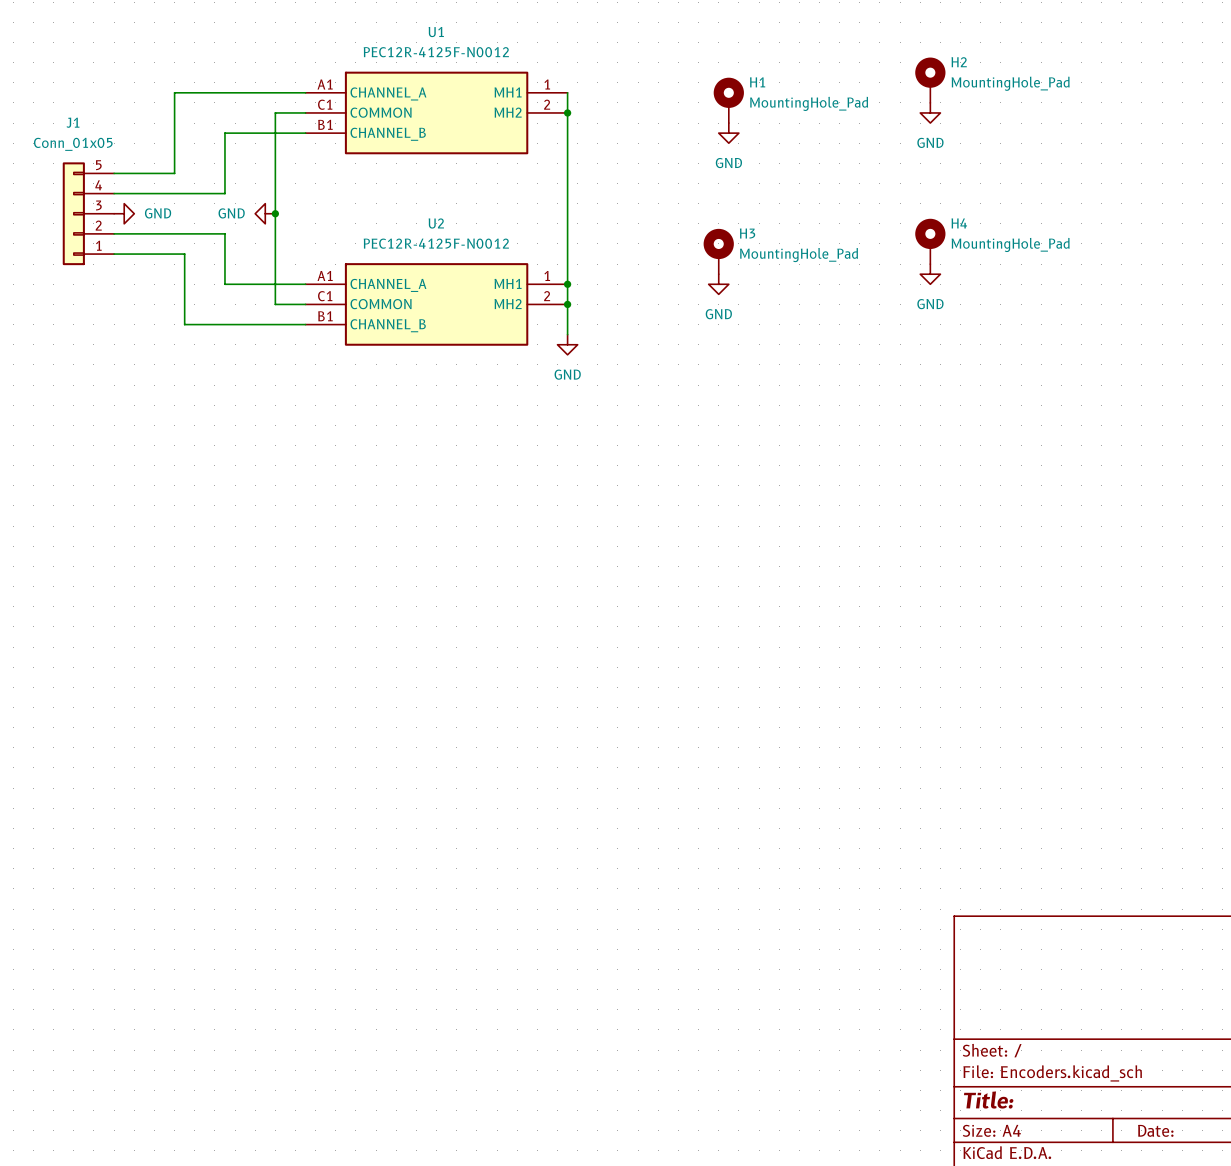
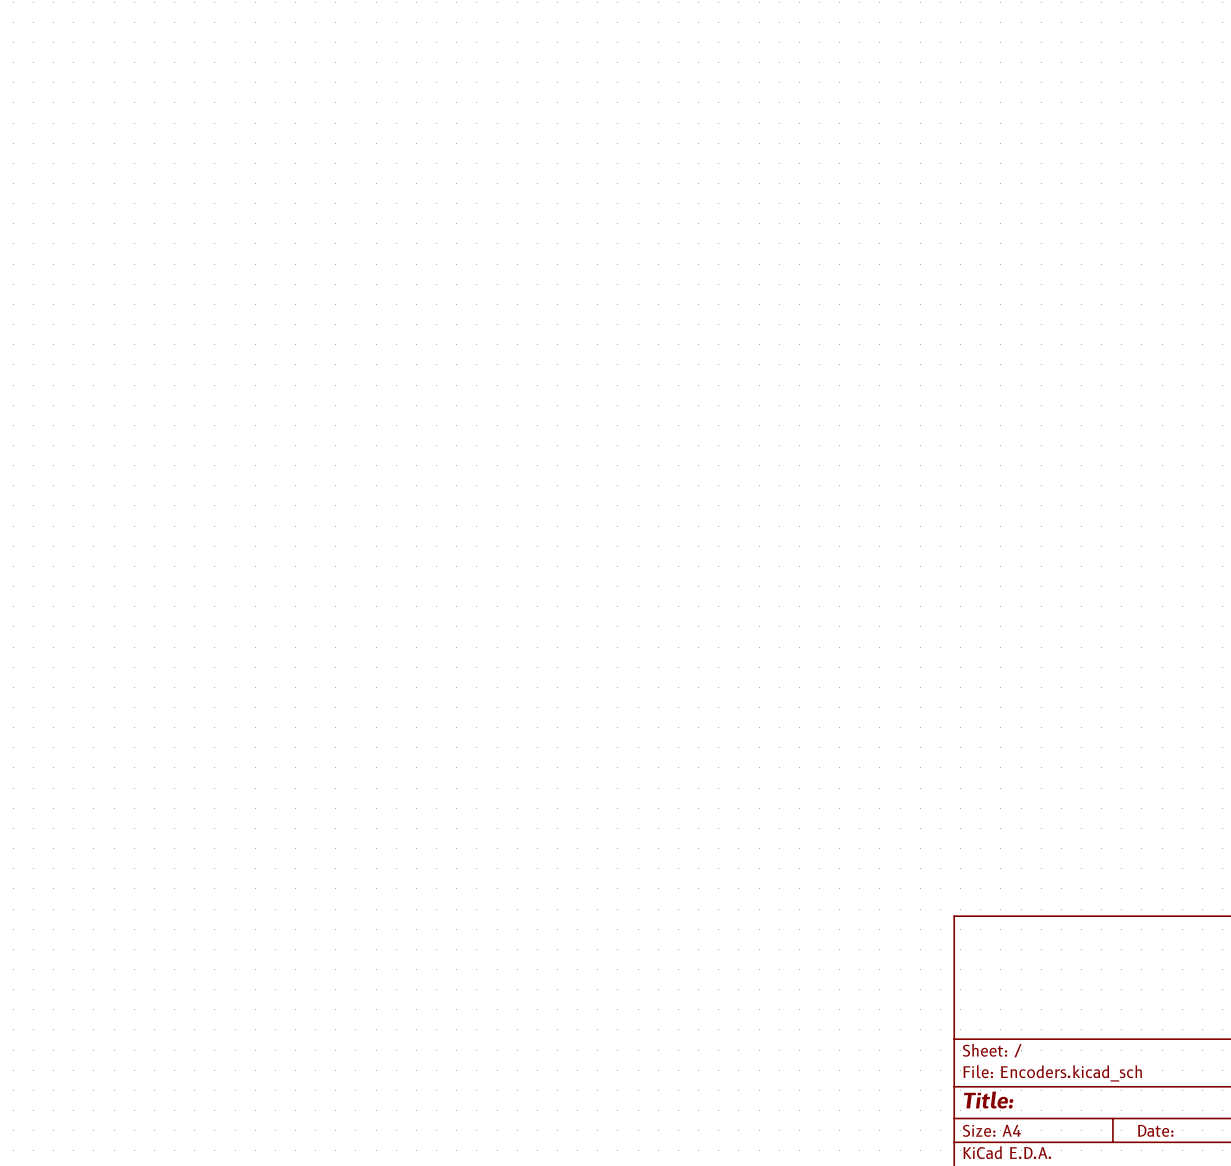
H2: MountingHole_Pad (930, 80) -> none
wire: (305, 92) (174, 92) (174, 173) (114, 173) -> none
wire: (567, 92) (567, 334) -> none
H1: MountingHole_Pad (728, 100) -> none
wire: (305, 112) (275, 112) (275, 304) (305, 304) -> none
U1: PEC12R-4125F-N0012 (436, 112) -> none
junction: (567, 112) -> none
power symbol: GND (930, 112) -> none
wire: (305, 133) (224, 133) (224, 193) (114, 193) -> none
power symbol: GND (728, 133) -> none
J1: Conn_01x05 (88, 213) -> none
power symbol: GND (124, 213) -> none
power symbol: GND (265, 213) -> none
junction: (275, 213) -> none
wire: (114, 233) (224, 233) (224, 284) (305, 284) -> none
H4: MountingHole_Pad (930, 241) -> none
H3: MountingHole_Pad (718, 251) -> none
wire: (114, 254) (184, 254) (184, 324) (305, 324) -> none
power symbol: GND (930, 274) -> none
junction: (567, 284) -> none
power symbol: GND (718, 284) -> none
U2: PEC12R-4125F-N0012 (436, 304) -> none
junction: (567, 304) -> none
power symbol: GND (567, 344) -> none

